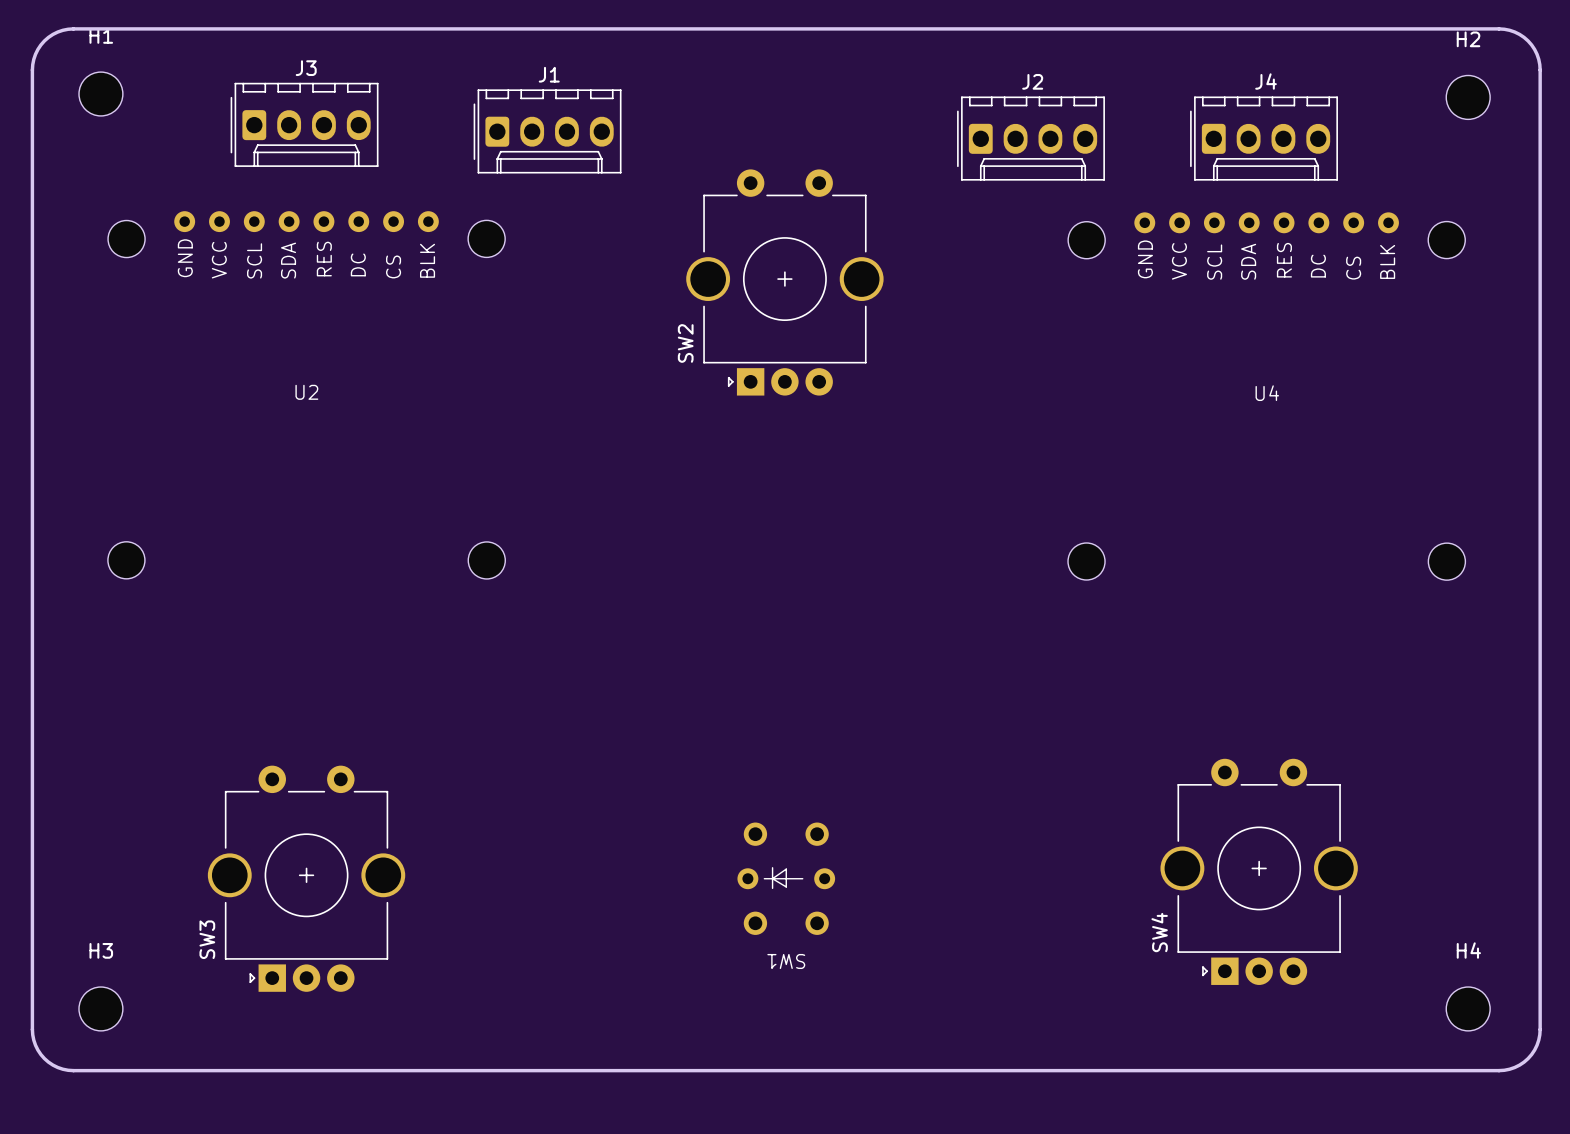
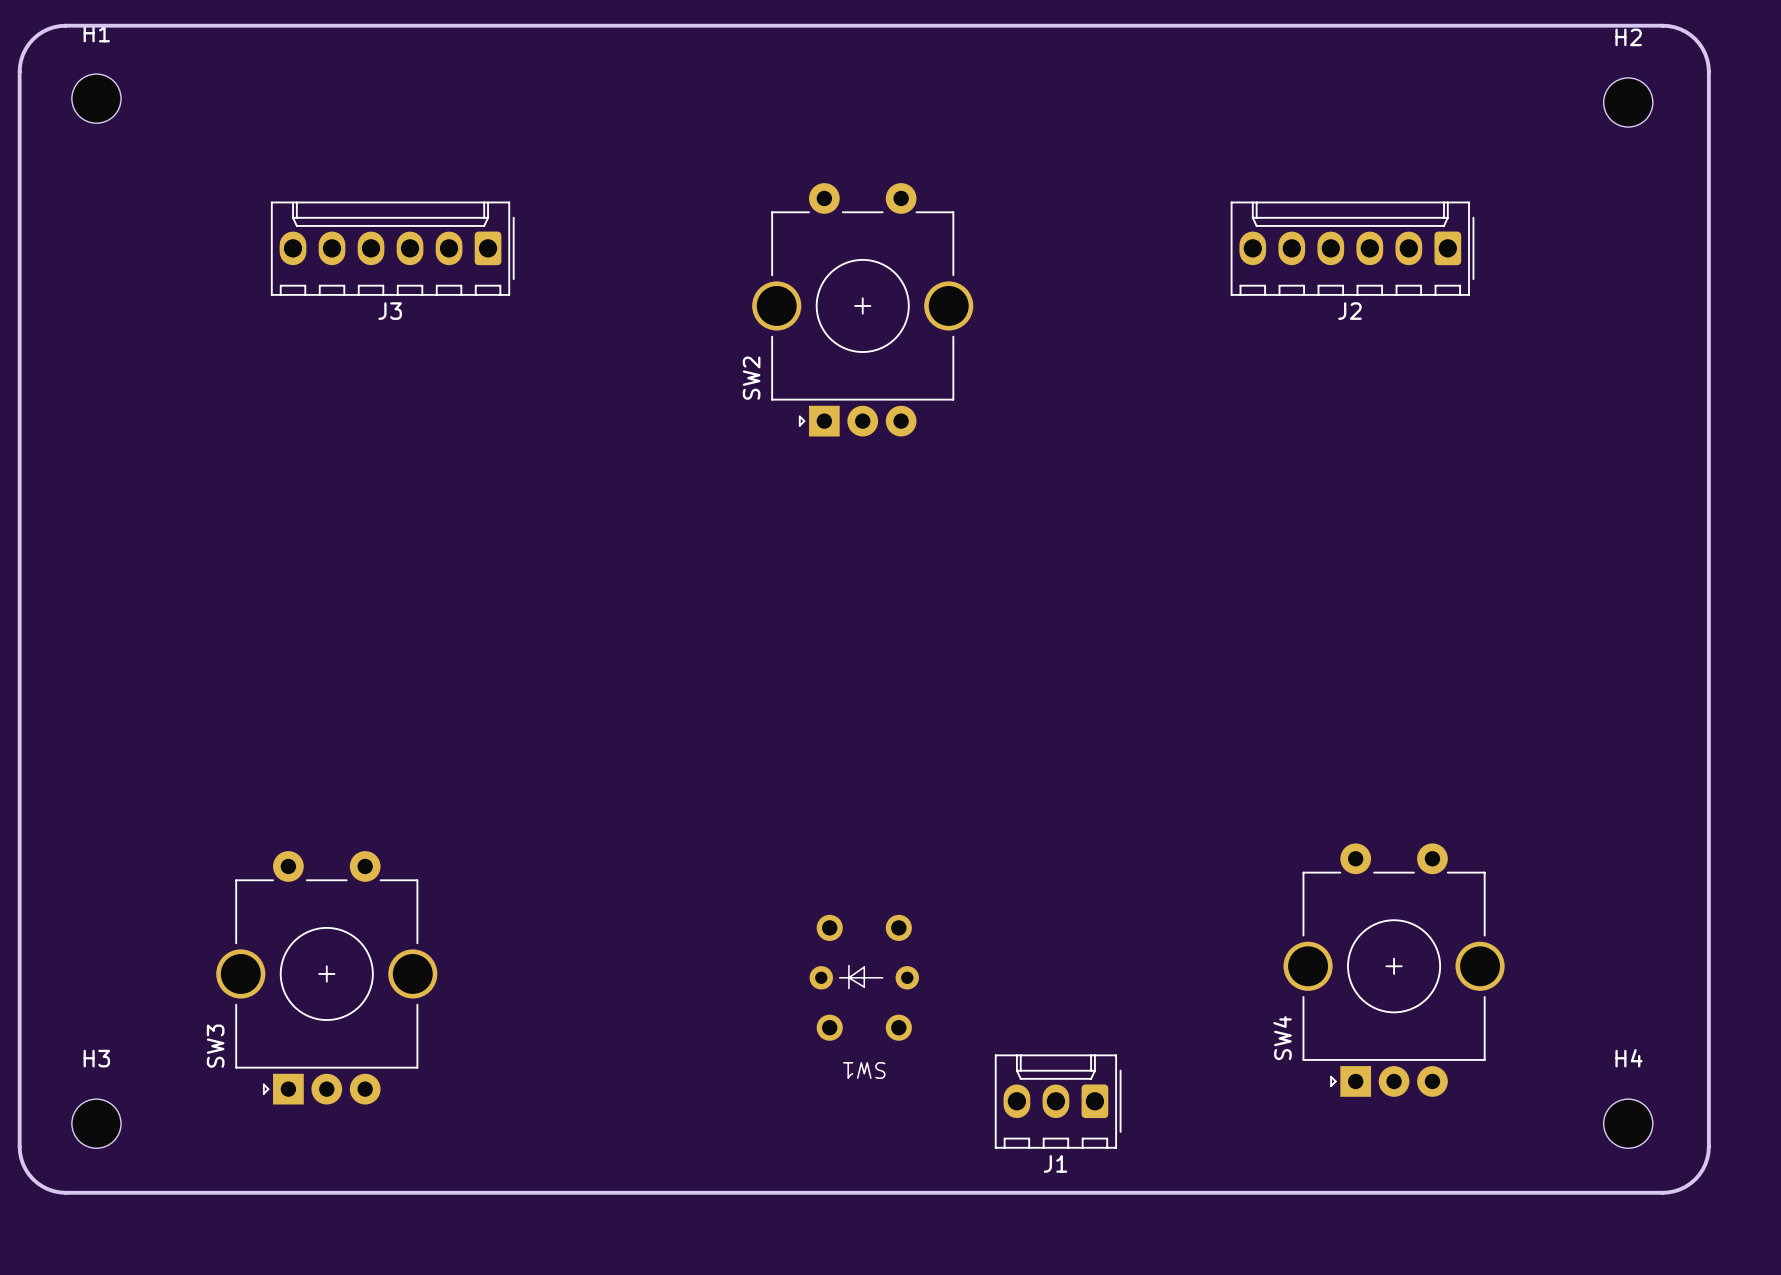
J3 name position: J3 (306, 68) -> J3 (390, 311)
J1 name position: J1 (549, 74) -> J1 (1055, 1163)
J2 name position: J2 (1032, 81) -> J2 (1349, 311)
J3 footprint: [230, 82, 379, 167] -> [270, 201, 515, 296]
J1 footprint: [473, 89, 622, 174] -> [994, 1054, 1122, 1149]
J2 footprint: [957, 96, 1105, 181] -> [1230, 201, 1475, 296]
J4: (1264, 138) -> none
U2: (306, 395) -> none
U4: (1266, 396) -> none

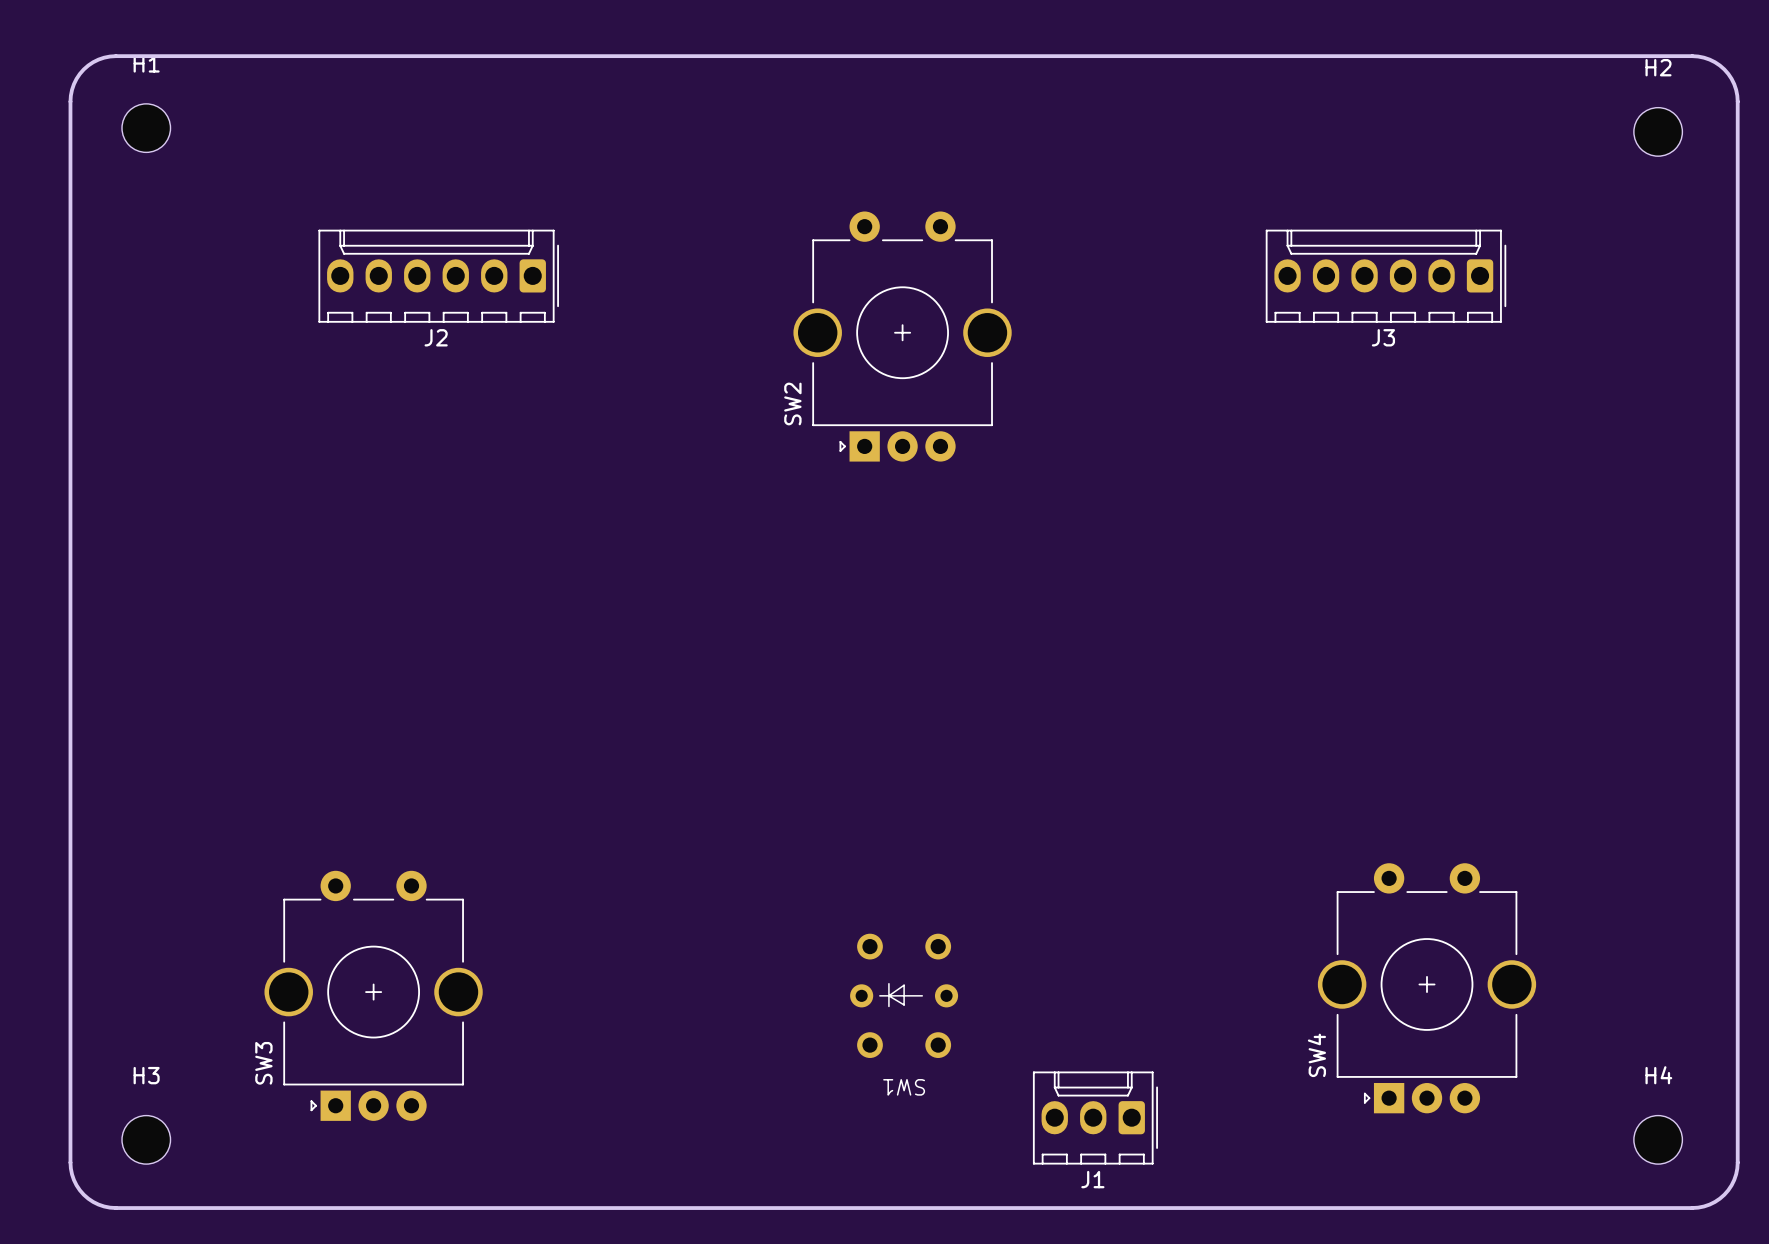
J3 name: J3 (390, 311) -> J2 (436, 337)
J2 name: J2 (1349, 311) -> J3 (1383, 337)

